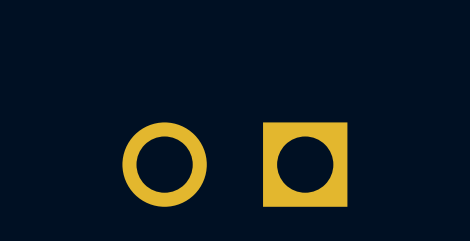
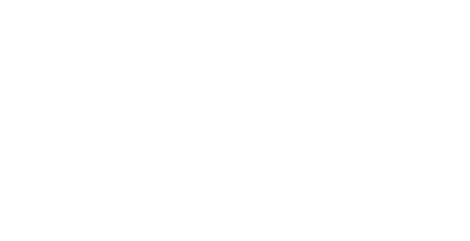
part: (234, 164) -> none

